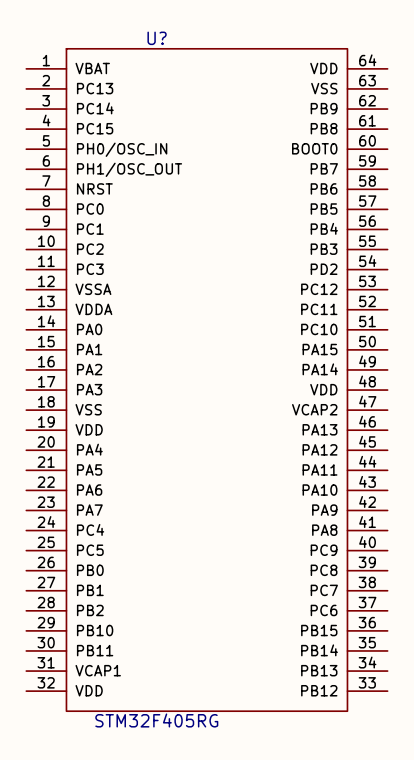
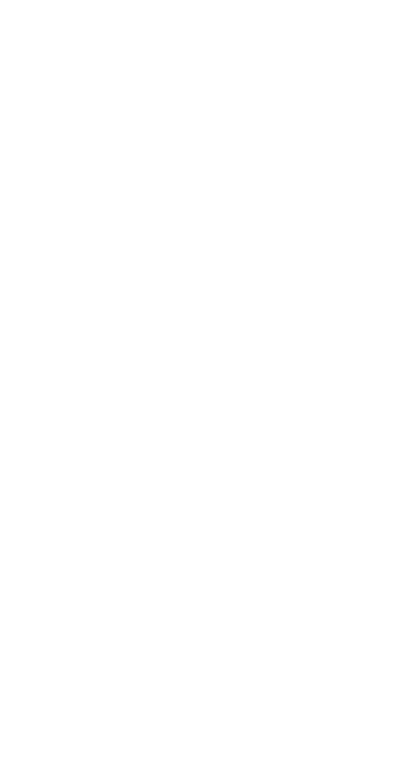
U?: STM32F405RG (206, 380) -> none

